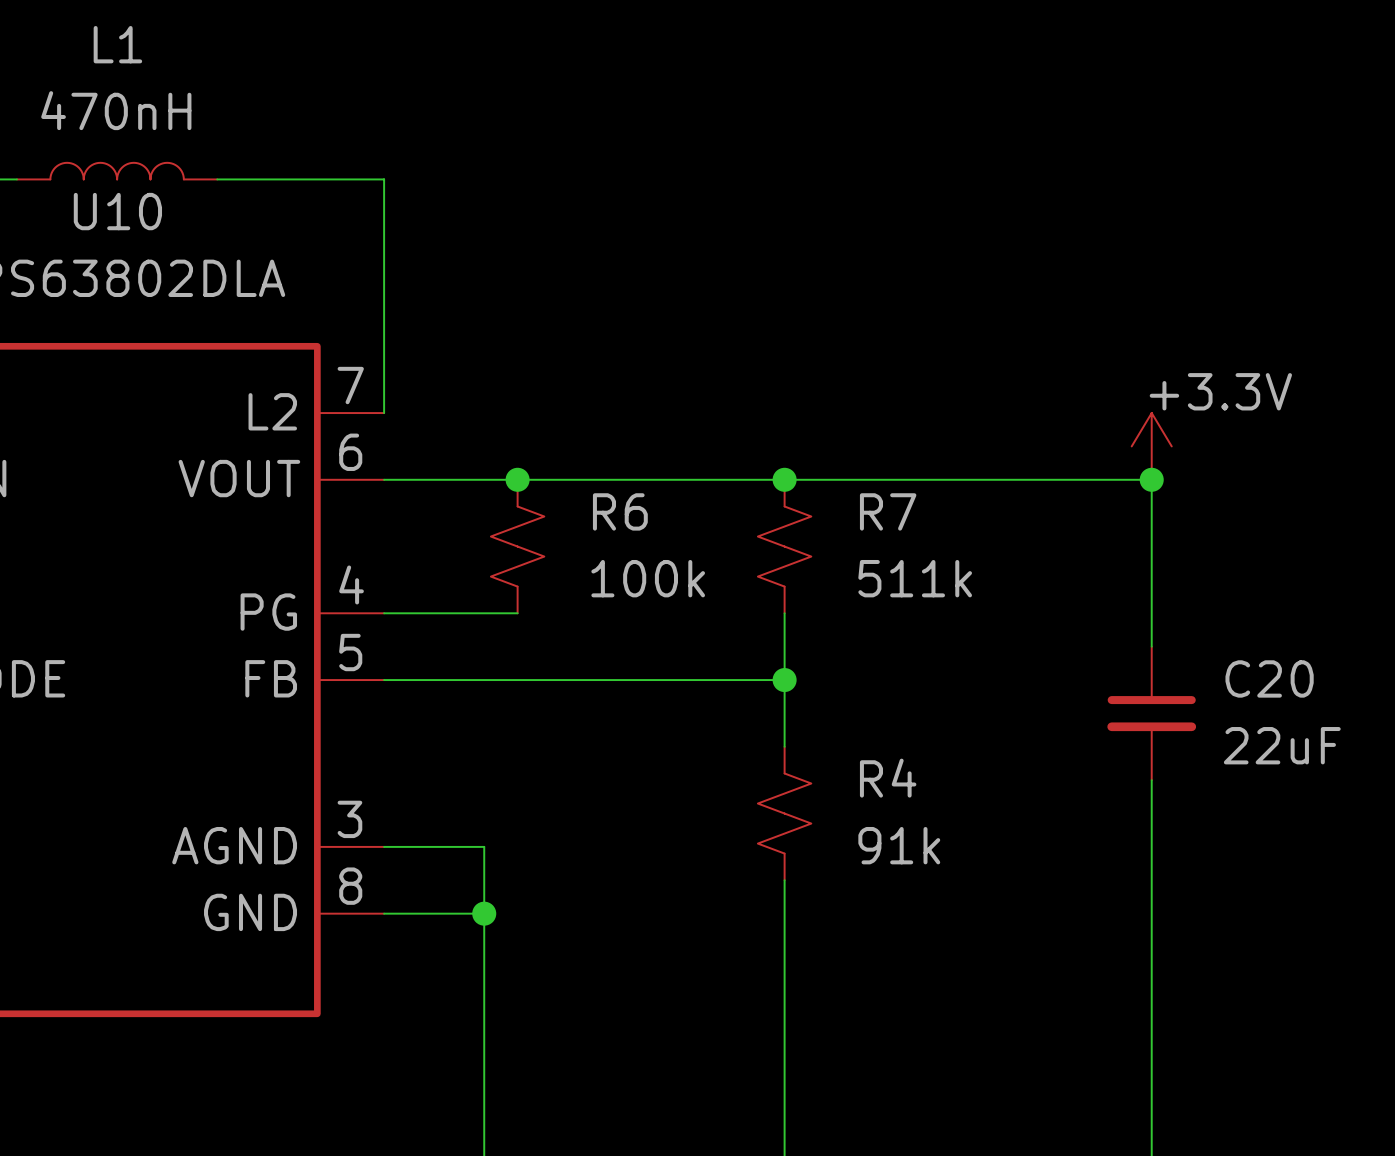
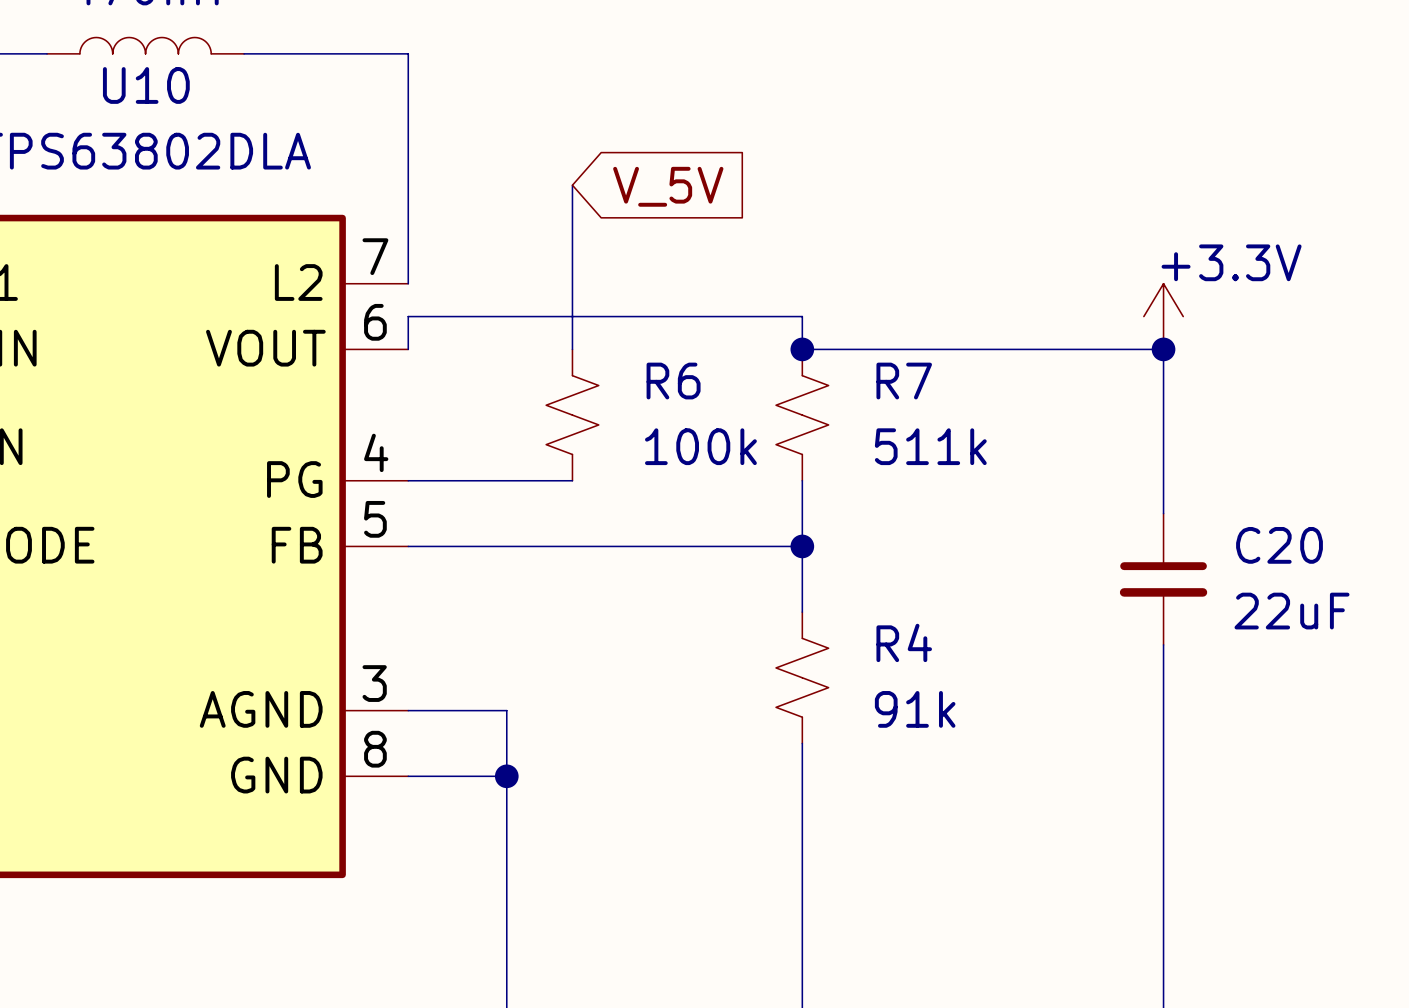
wire: none -> (572, 185) (572, 349)
global label: none -> V_5V (668, 186)
wire: (384, 479) (784, 479) -> (408, 349) (408, 316) (802, 316) (802, 349)
junction: (517, 479) -> none
R6 position: (517, 546) -> (572, 415)
wire: none -> (539, 480) (572, 480)

